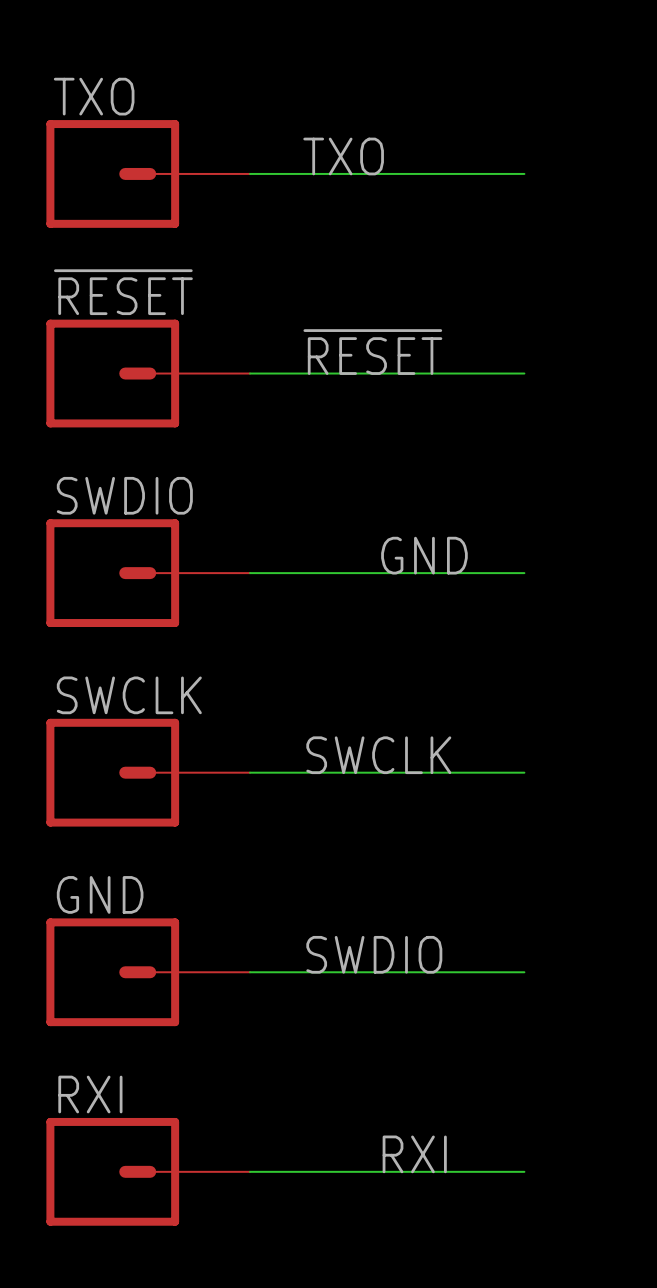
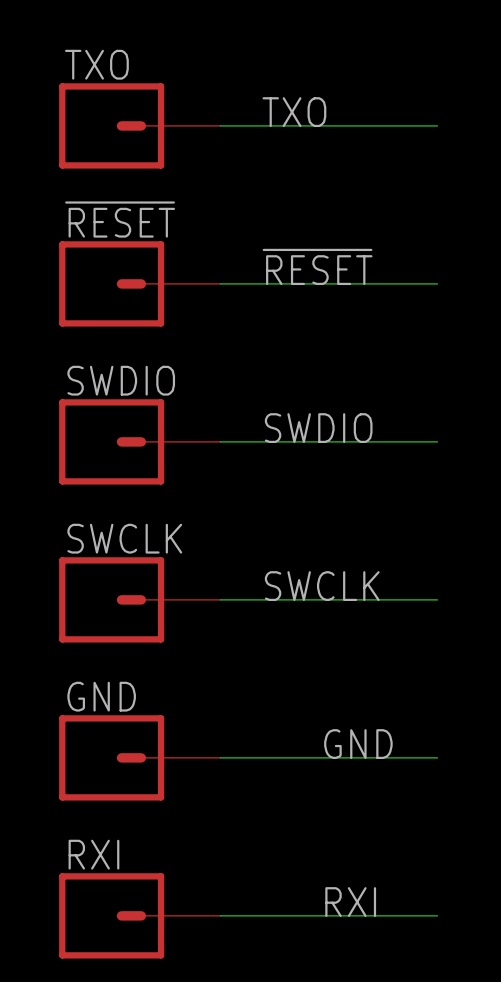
label position: GND (424, 555) -> GND (358, 744)
label position: SWDIO (374, 954) -> SWDIO (318, 428)

